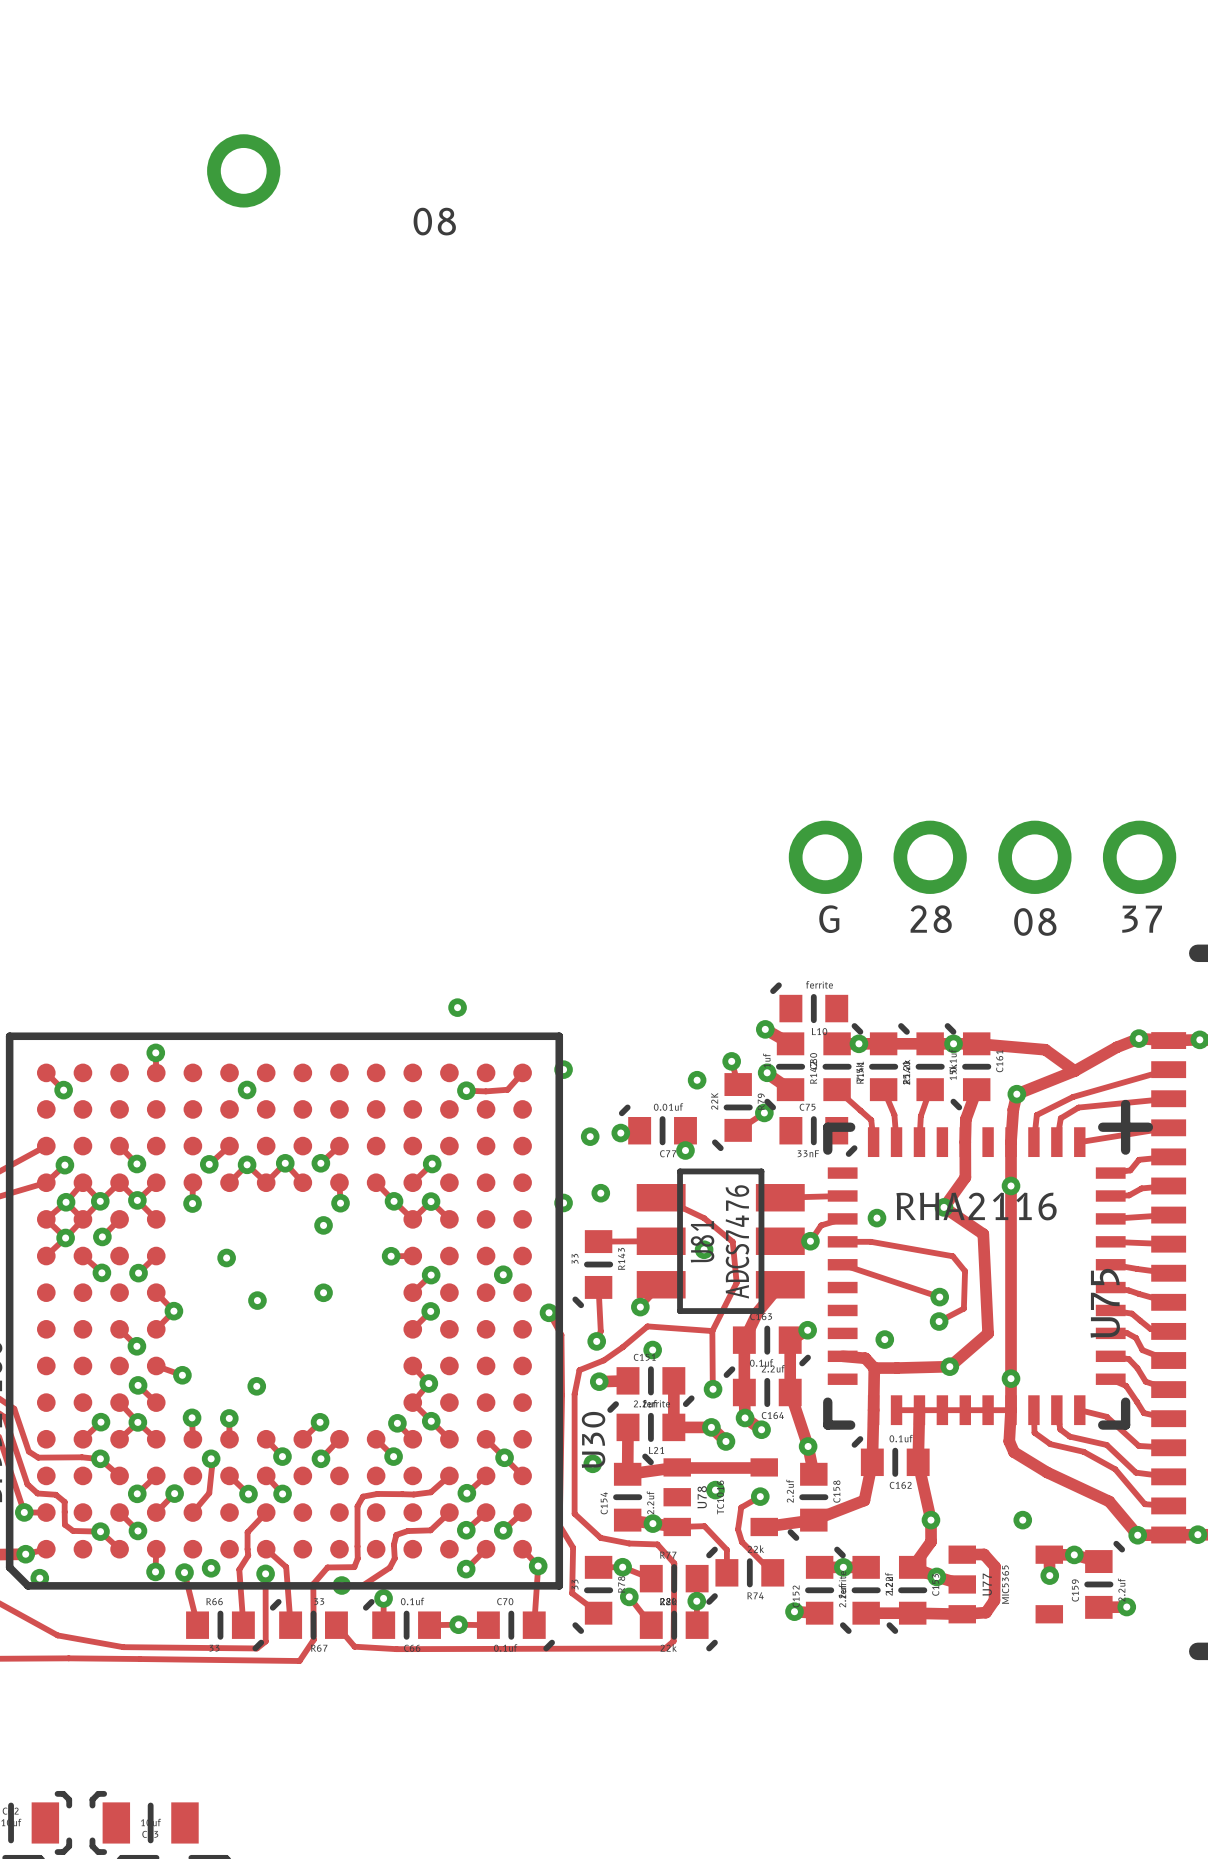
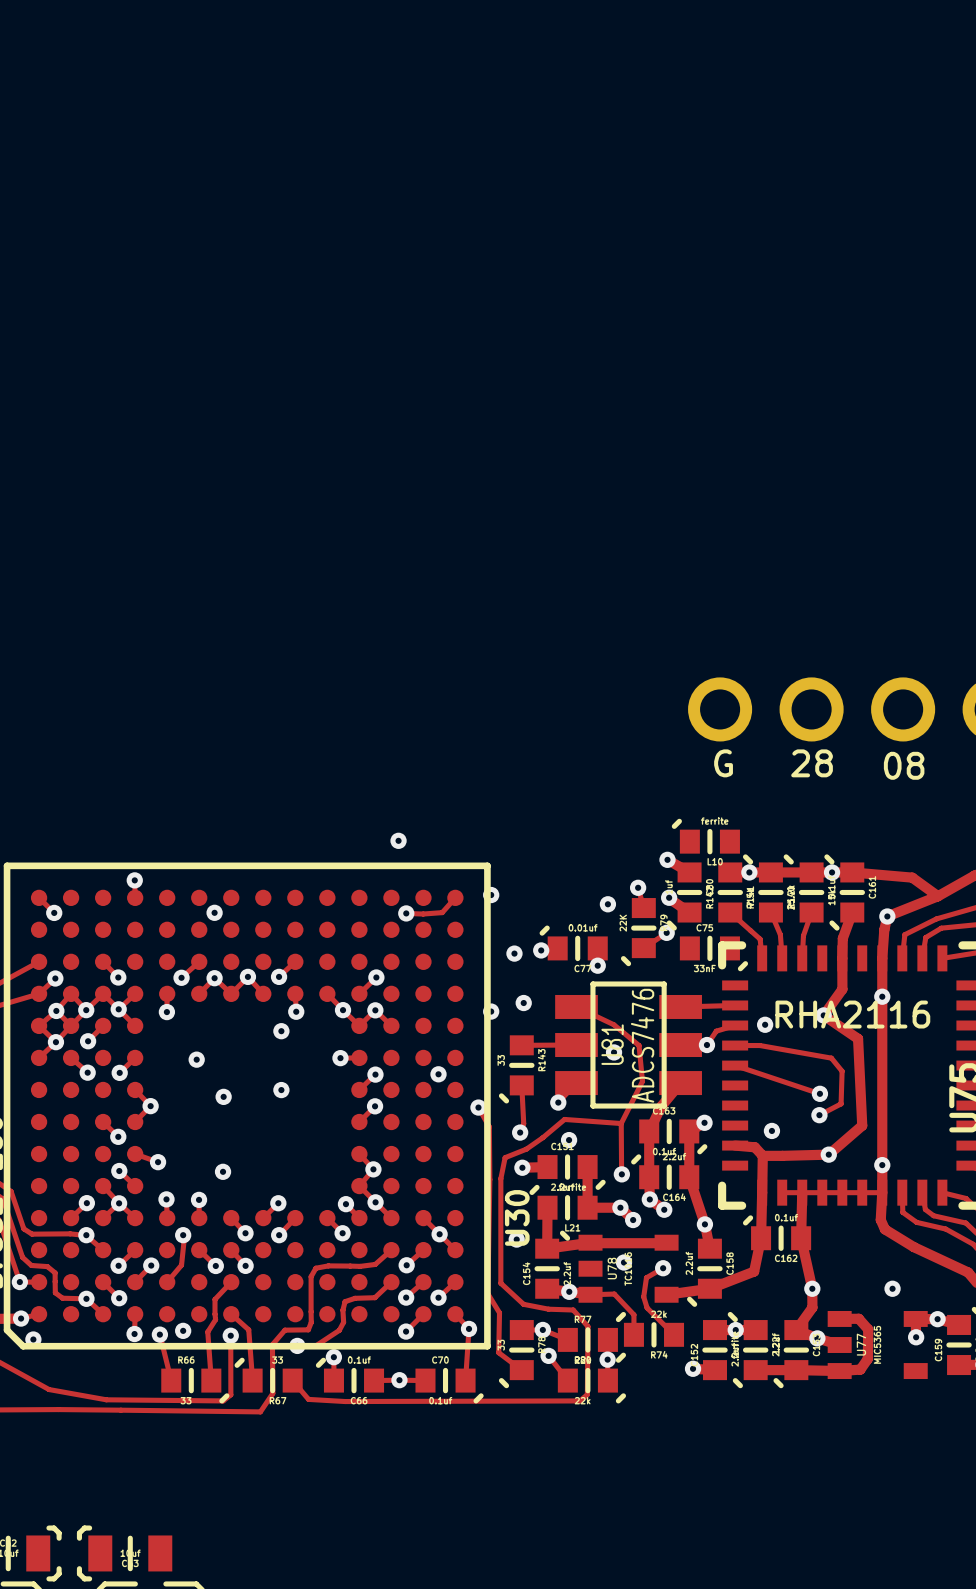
part: 08 (243, 170) -> none

